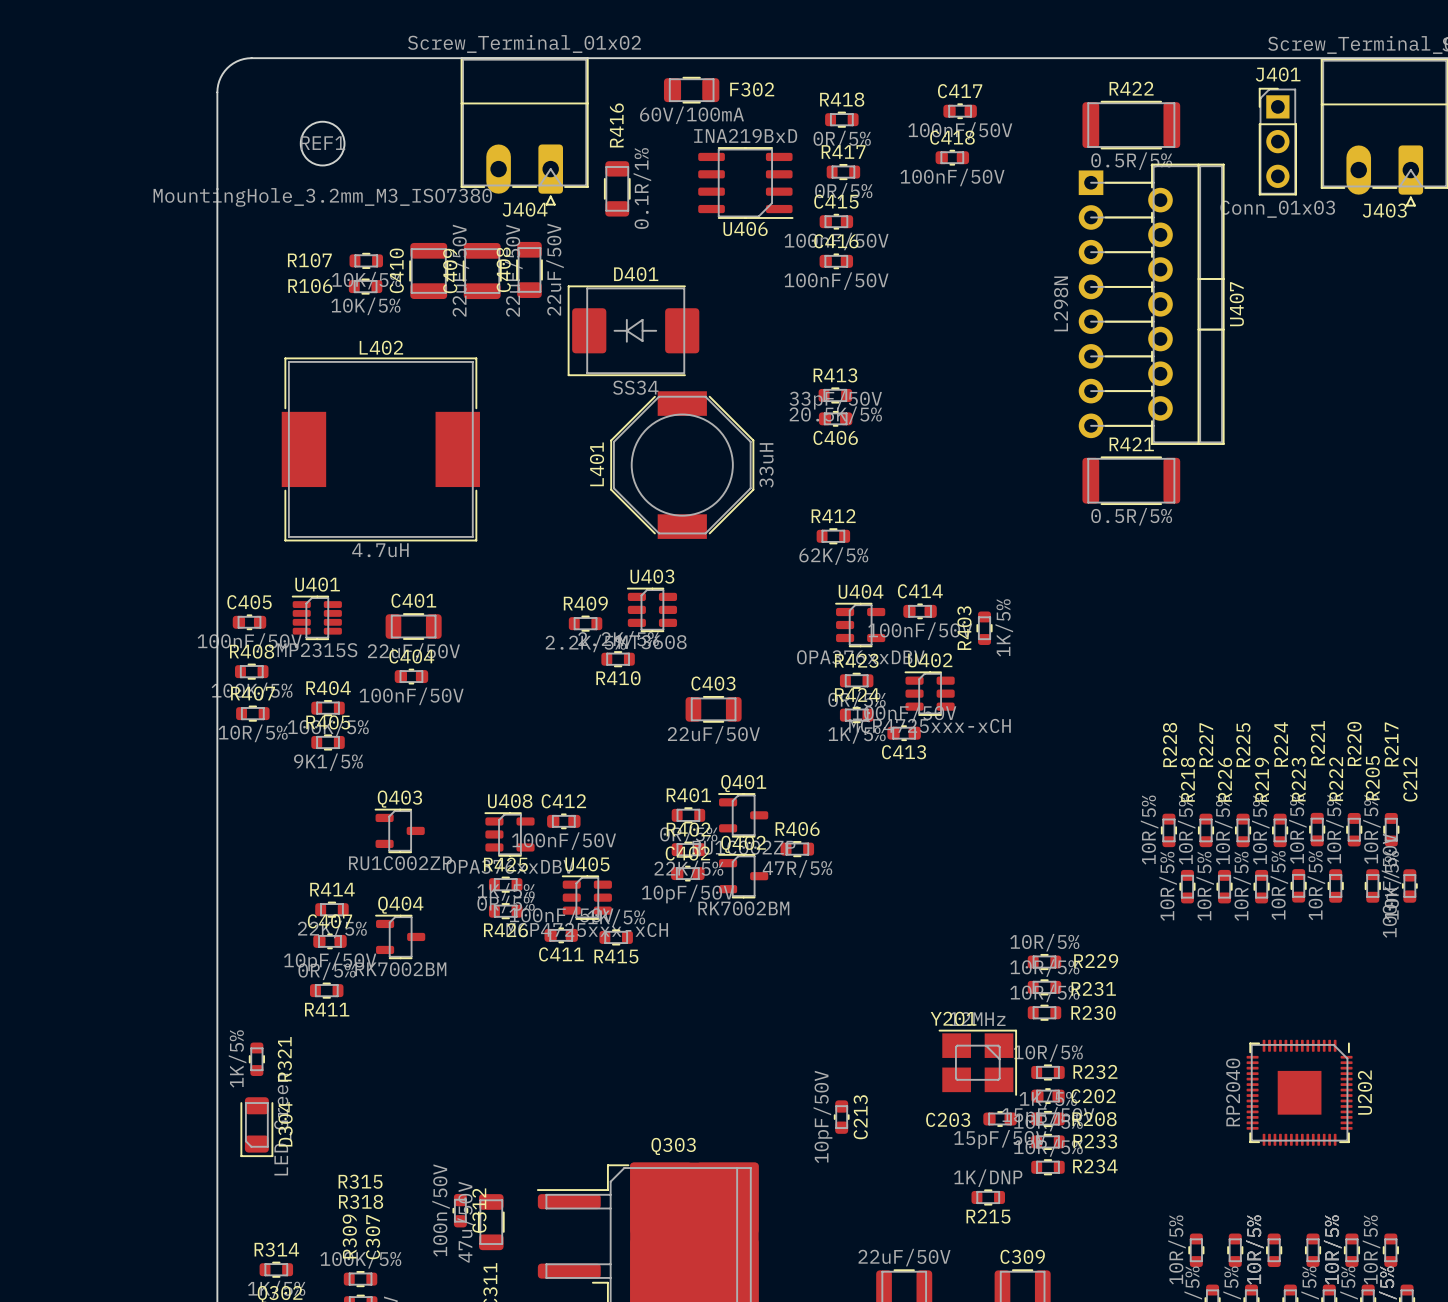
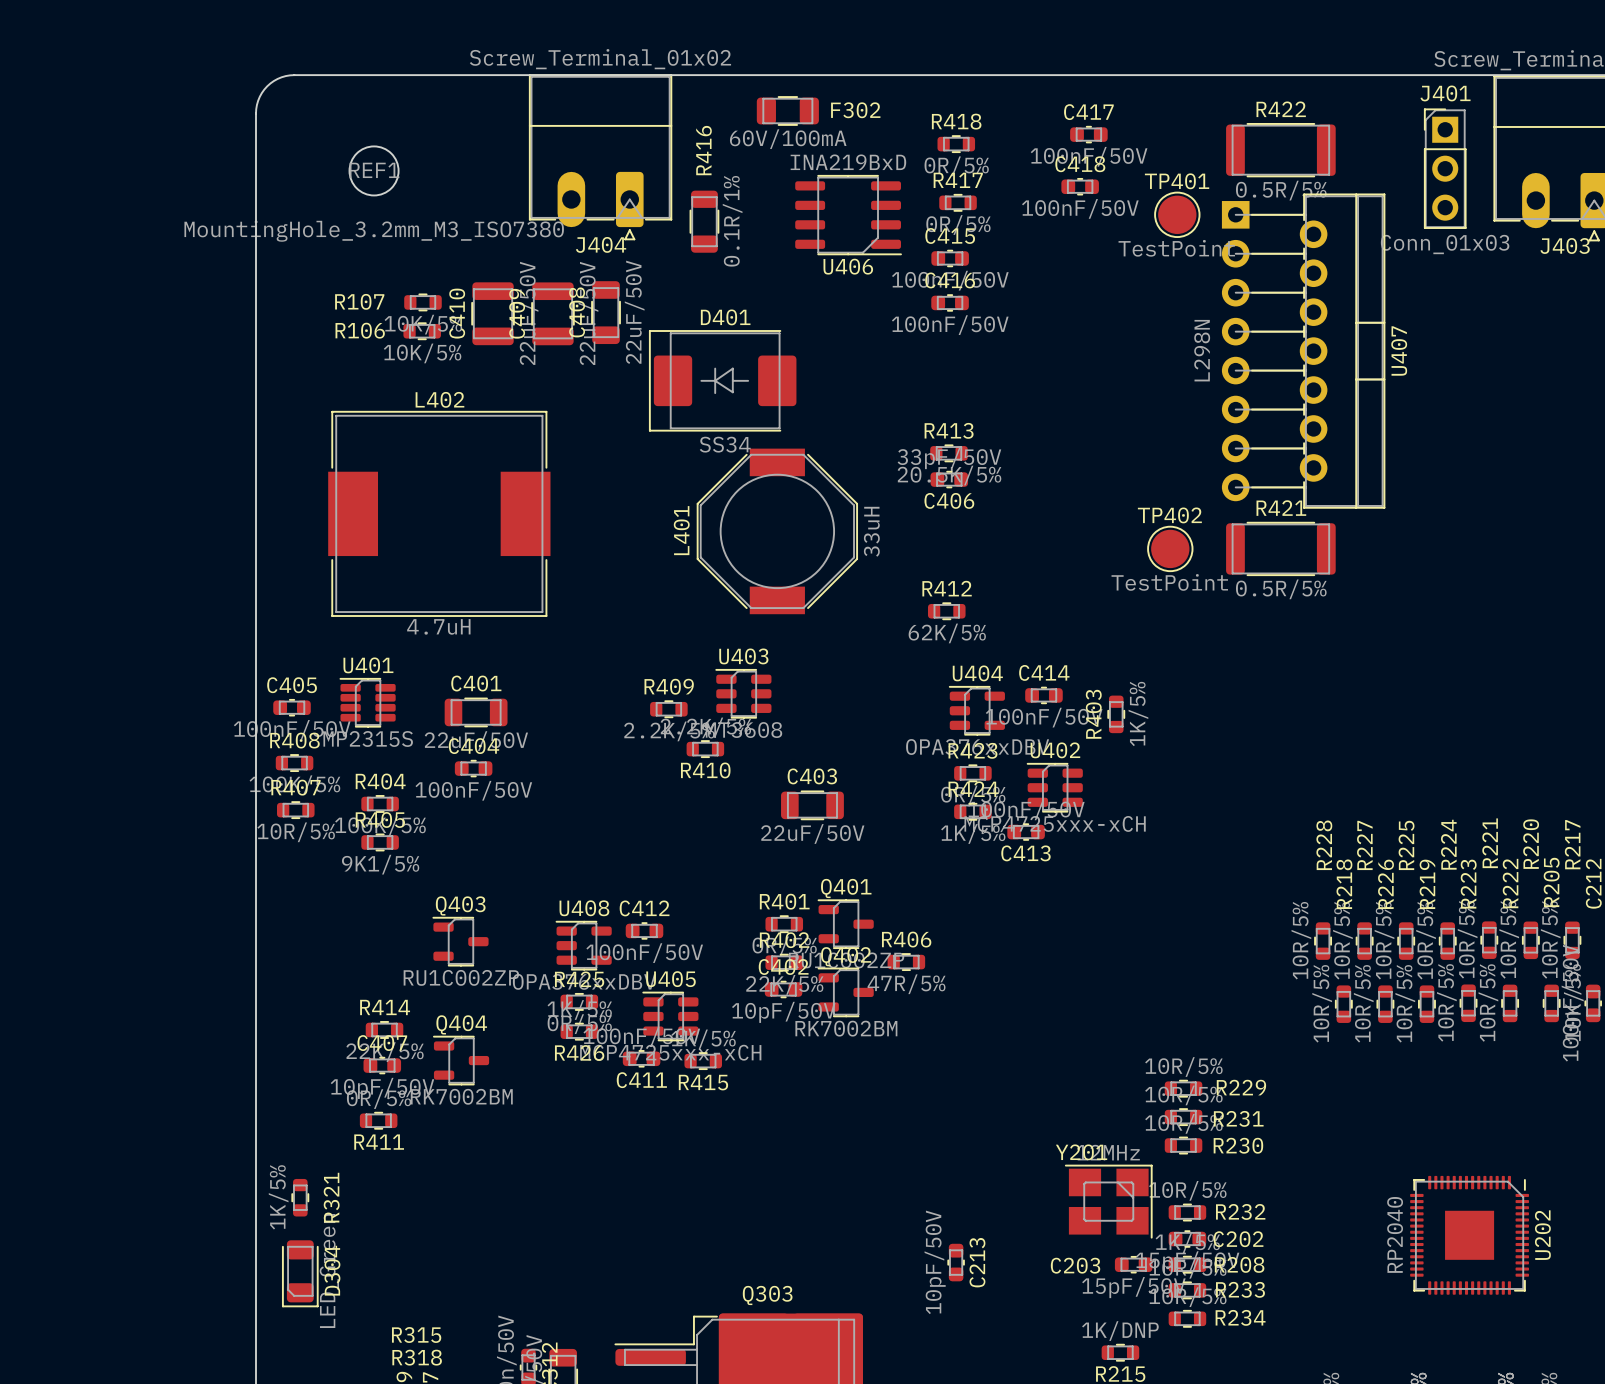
TP401: none -> TestPoint (1177, 214)
TP402: none -> TestPoint (1170, 548)

